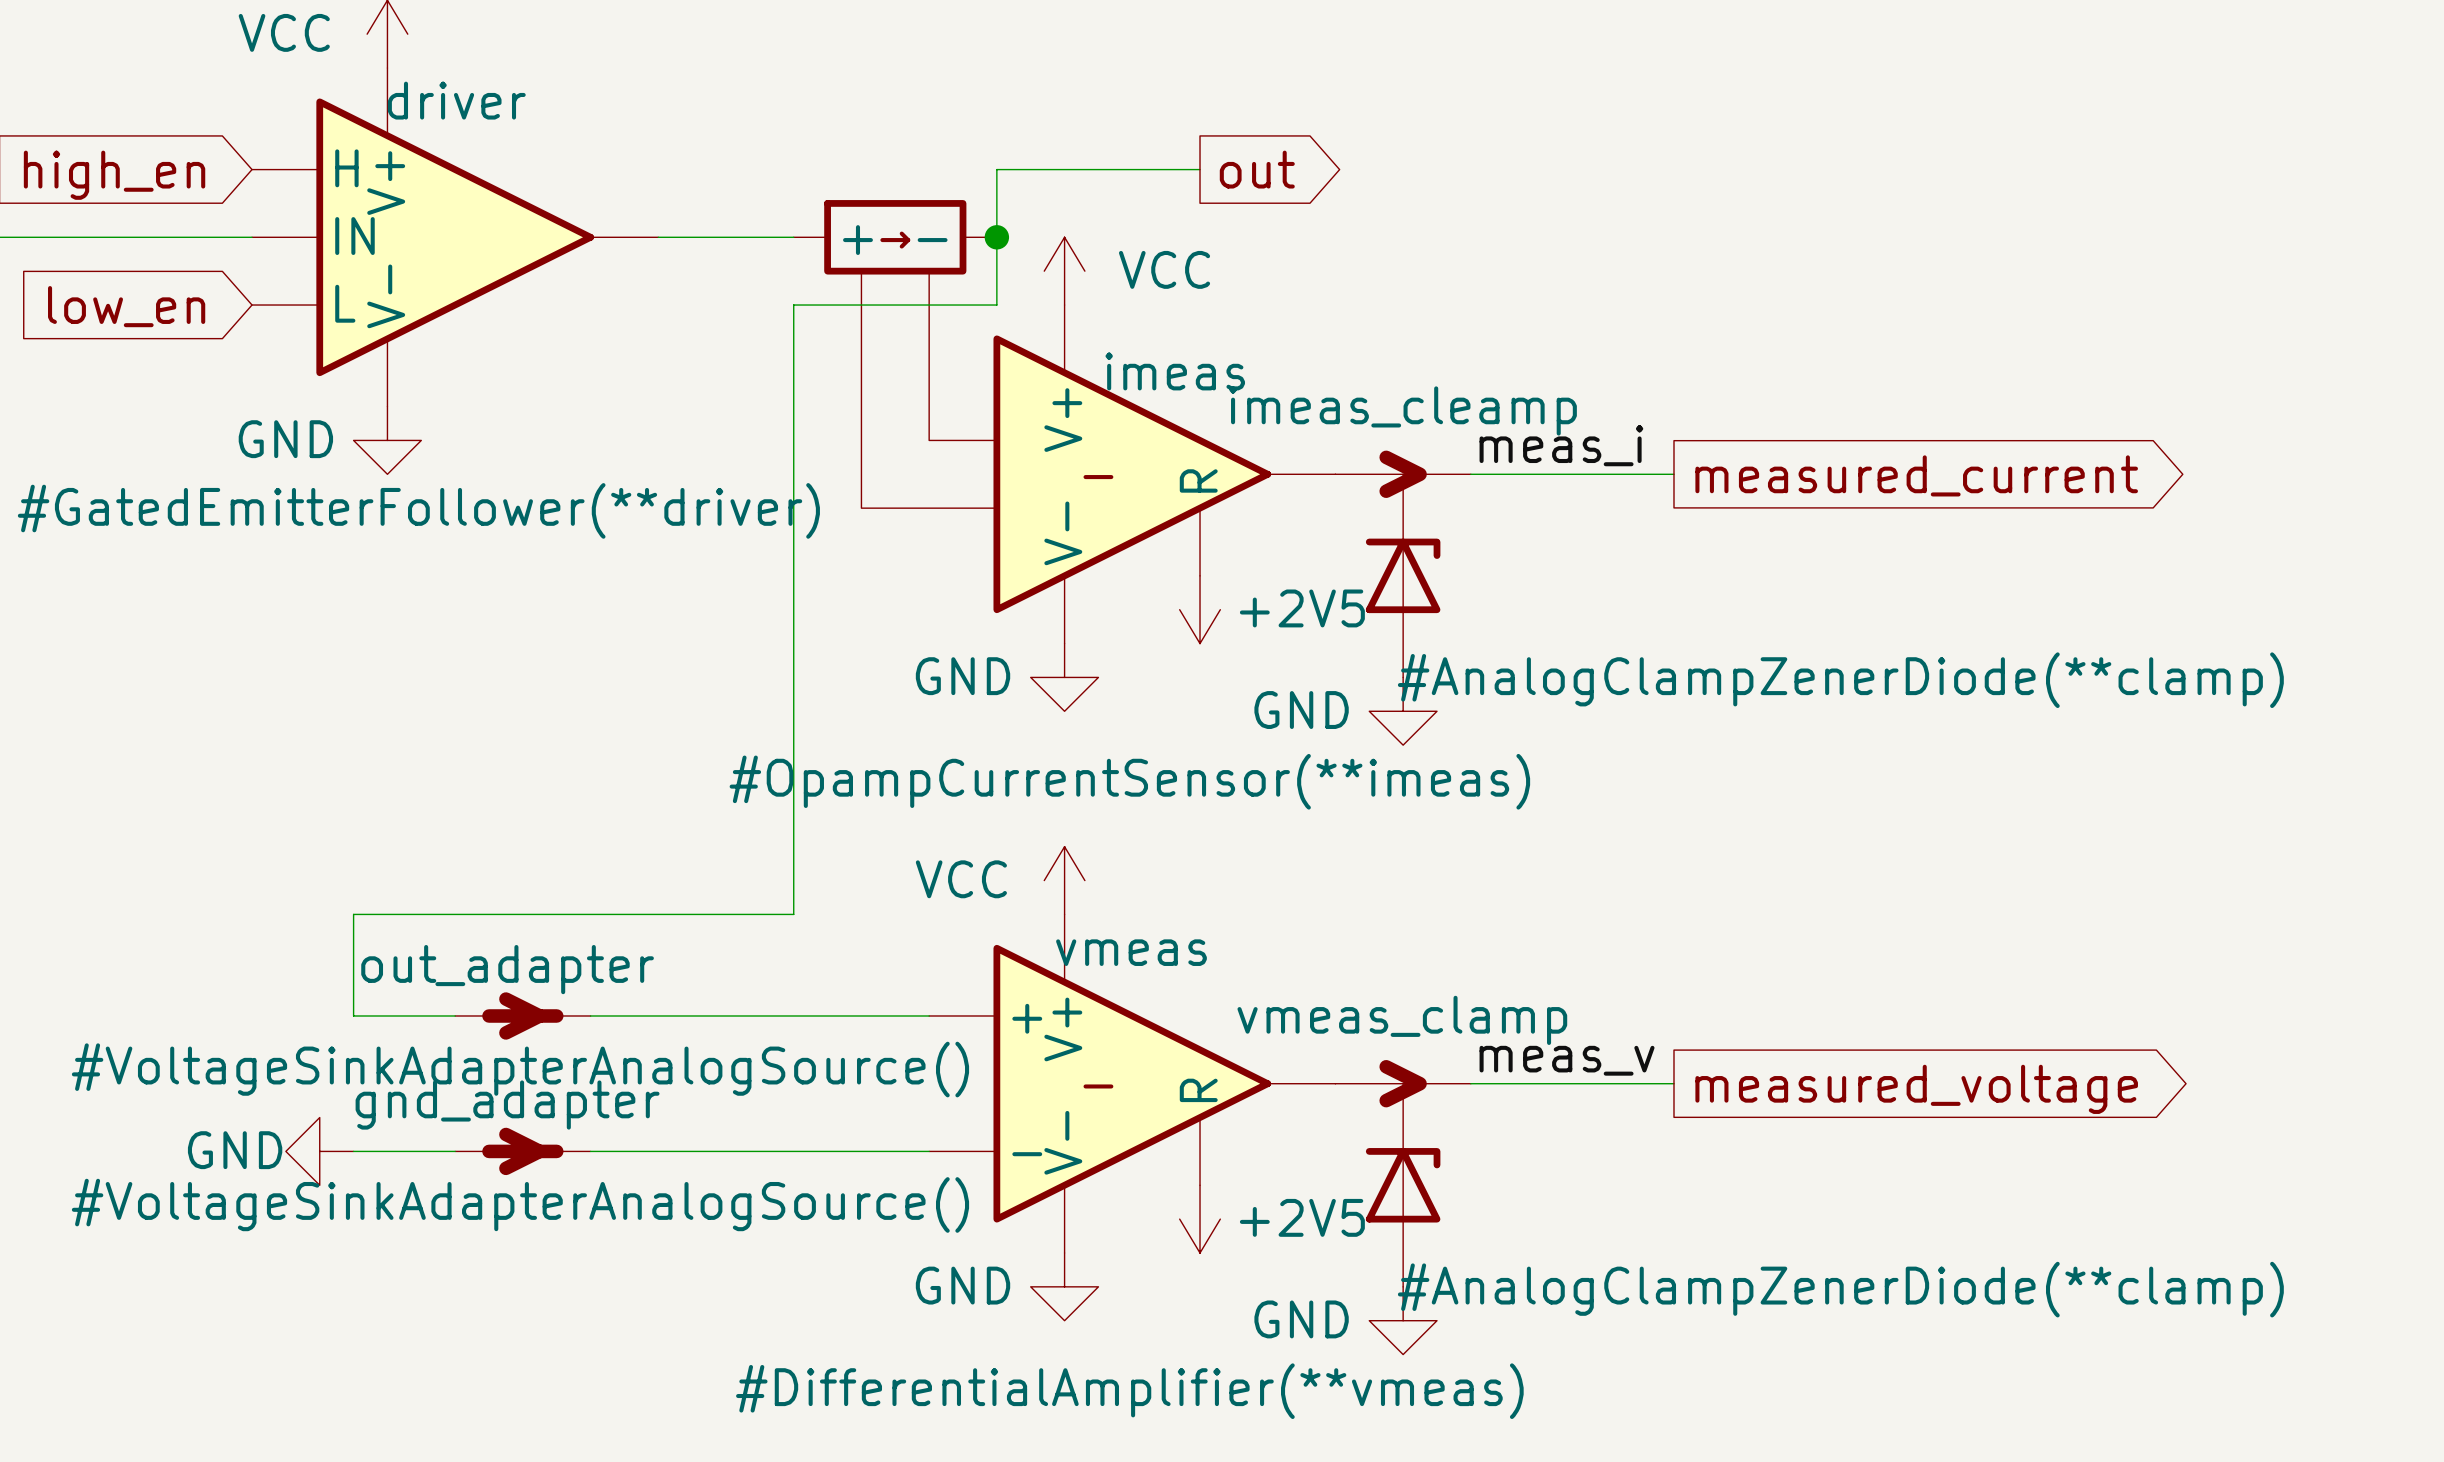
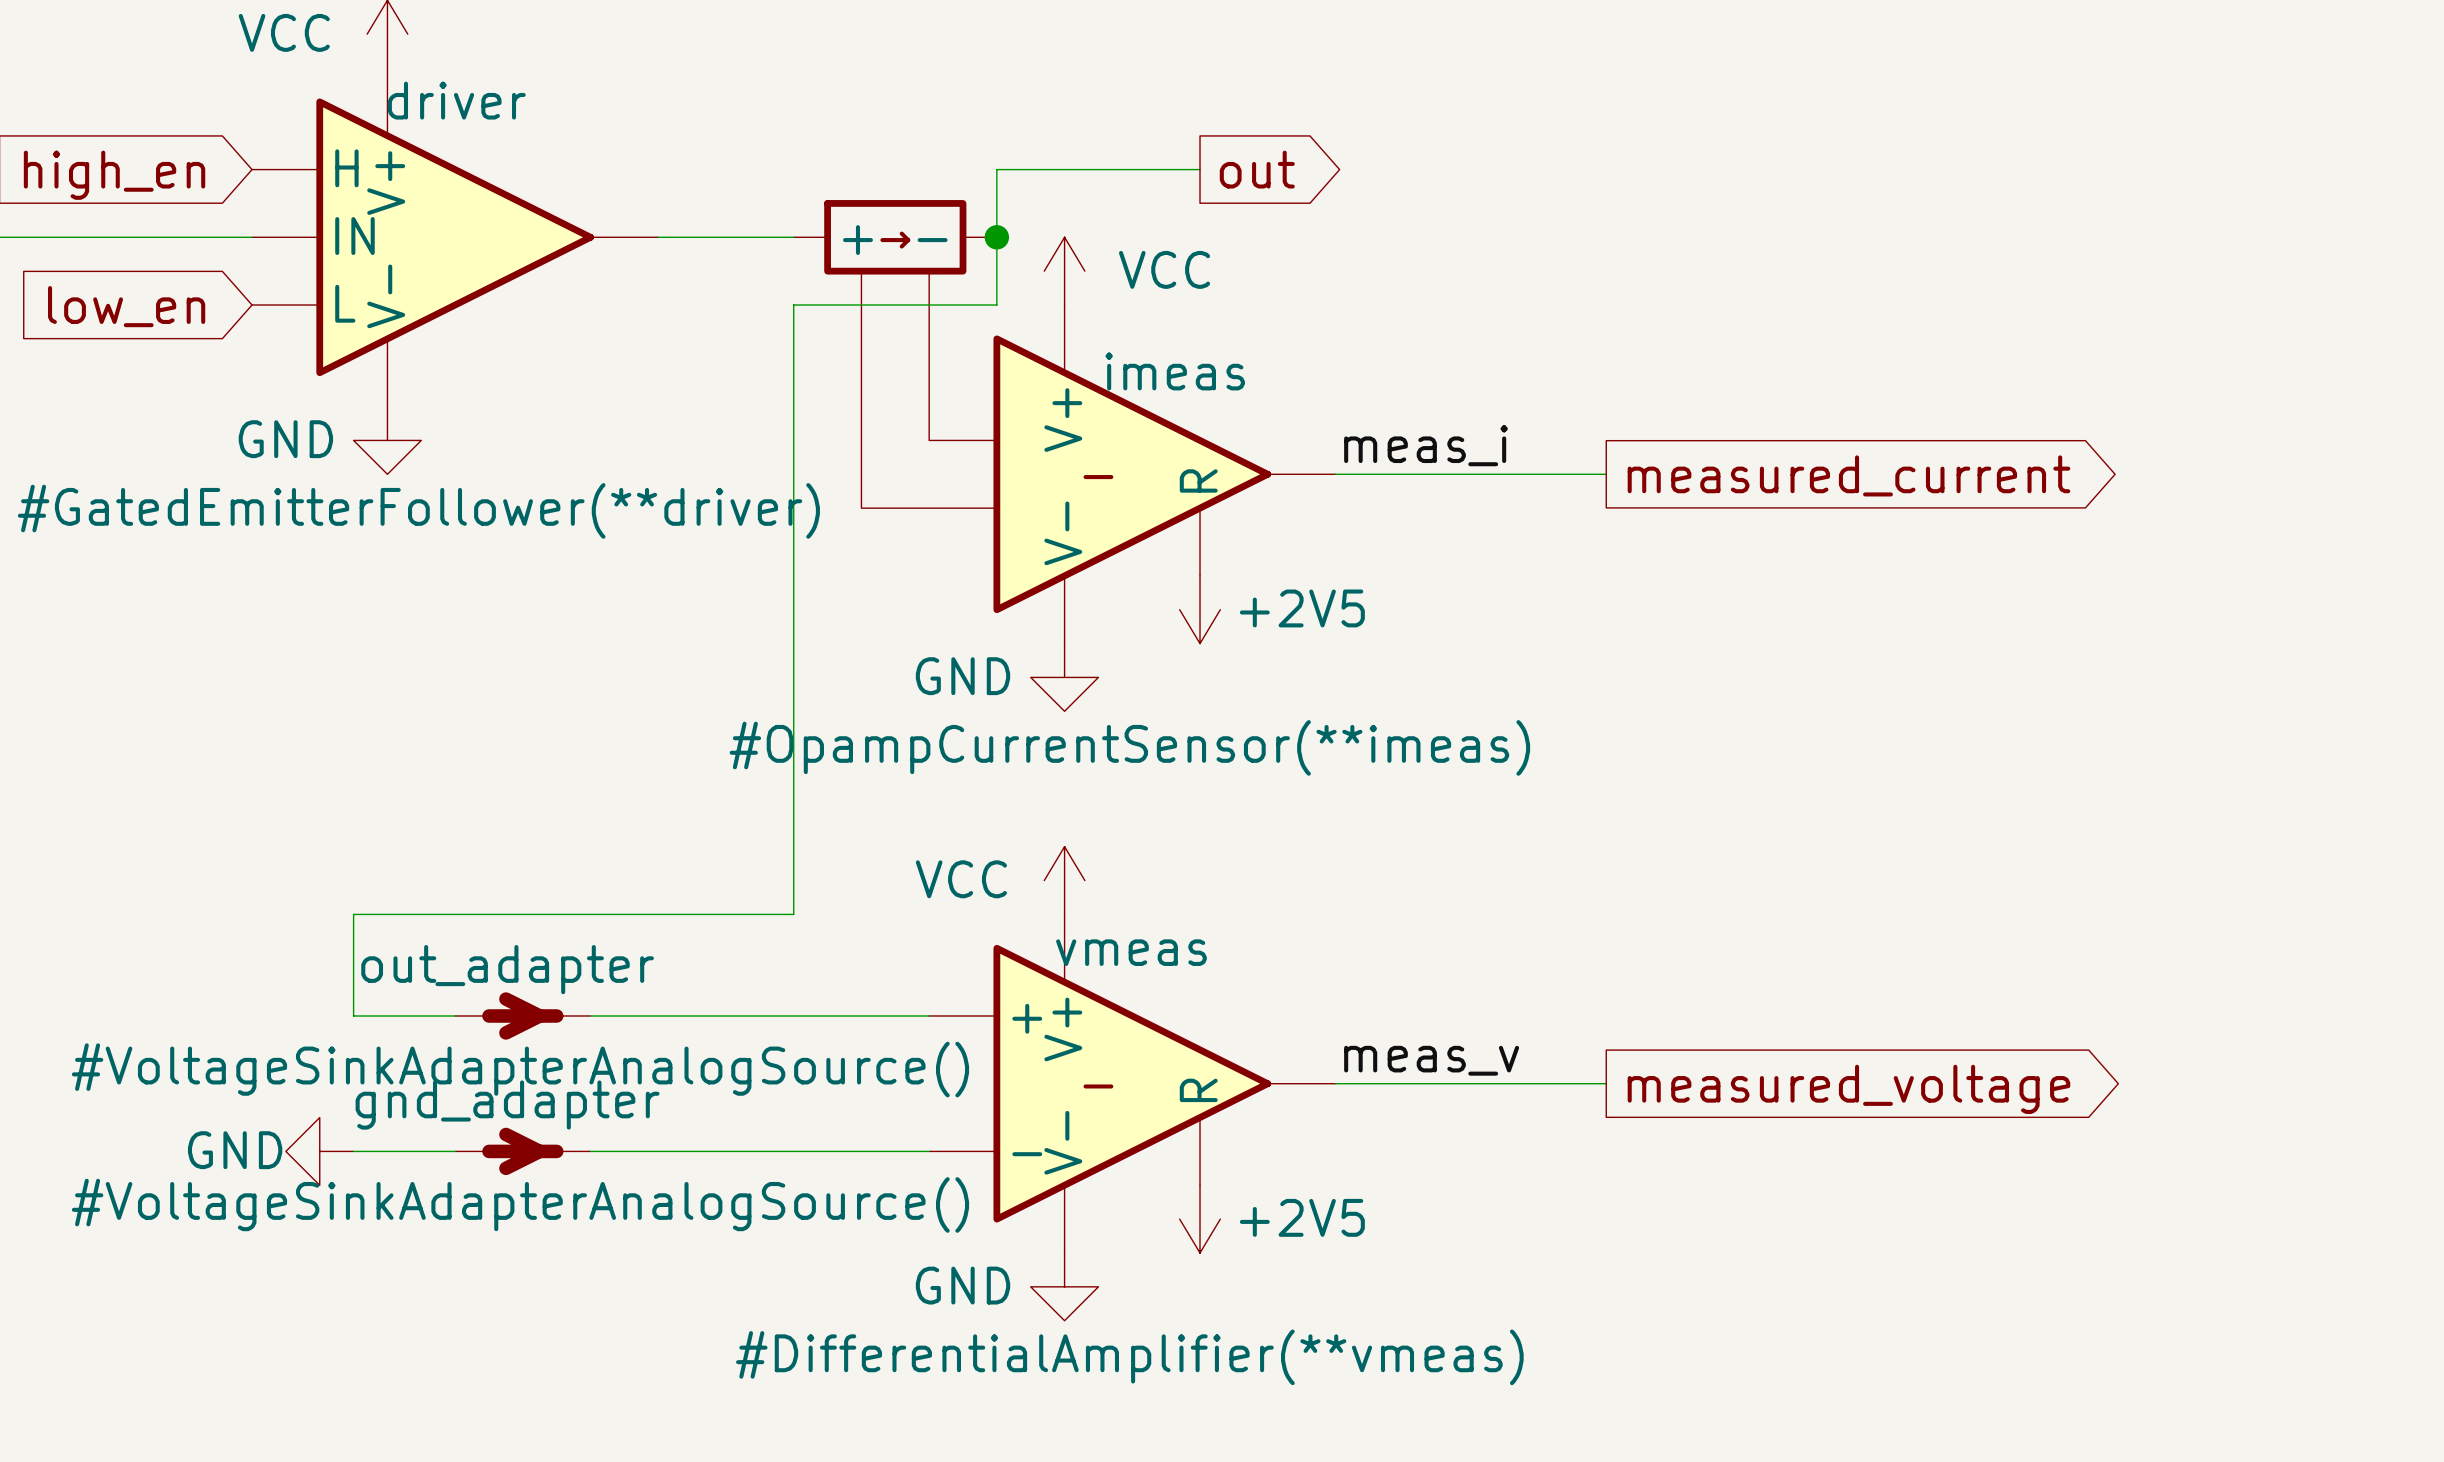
label position: meas_i (1561, 445) -> meas_i (1425, 445)
wire: (1606, 474) (1673, 474) -> none
global label position: measured_current (1916, 475) -> measured_current (1848, 475)
imeas_cleamp: #AnalogClampZenerDiode(**clamp) (1403, 564) -> none
power symbol: GND (1403, 711) -> none
imeas value position: #OpampCurrentSensor(**imeas) (1129, 781) -> #OpampCurrentSensor(**imeas) (1129, 747)
label position: meas_v (1567, 1060) -> meas_v (1431, 1060)
wire: (1606, 1083) (1673, 1083) -> none
global label position: measured_voltage (1916, 1089) -> measured_voltage (1848, 1089)
vmeas_clamp: #AnalogClampZenerDiode(**clamp) (1403, 1173) -> none
power symbol: GND (1403, 1320) -> none
vmeas value position: #DifferentialAmplifier(**vmeas) (1129, 1391) -> #DifferentialAmplifier(**vmeas) (1129, 1357)

